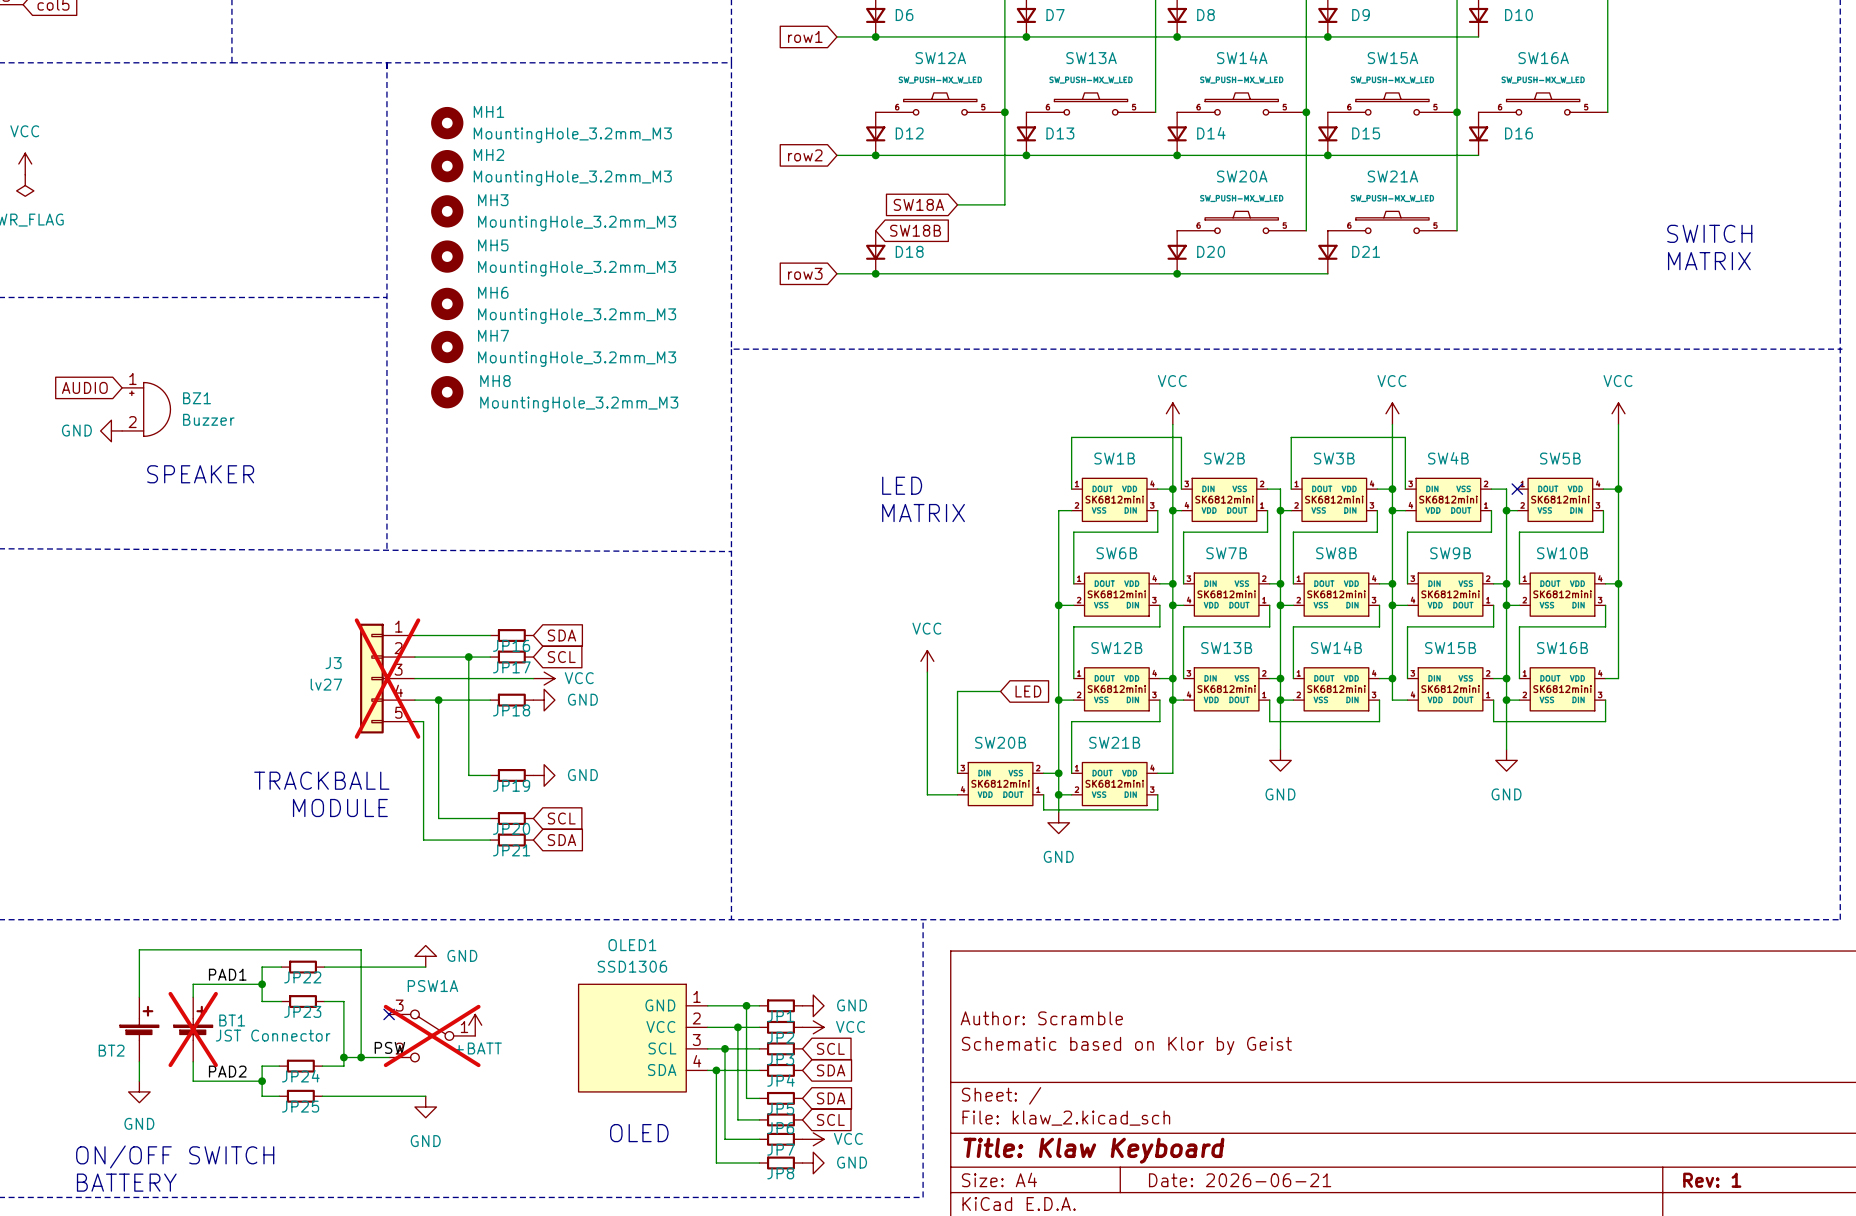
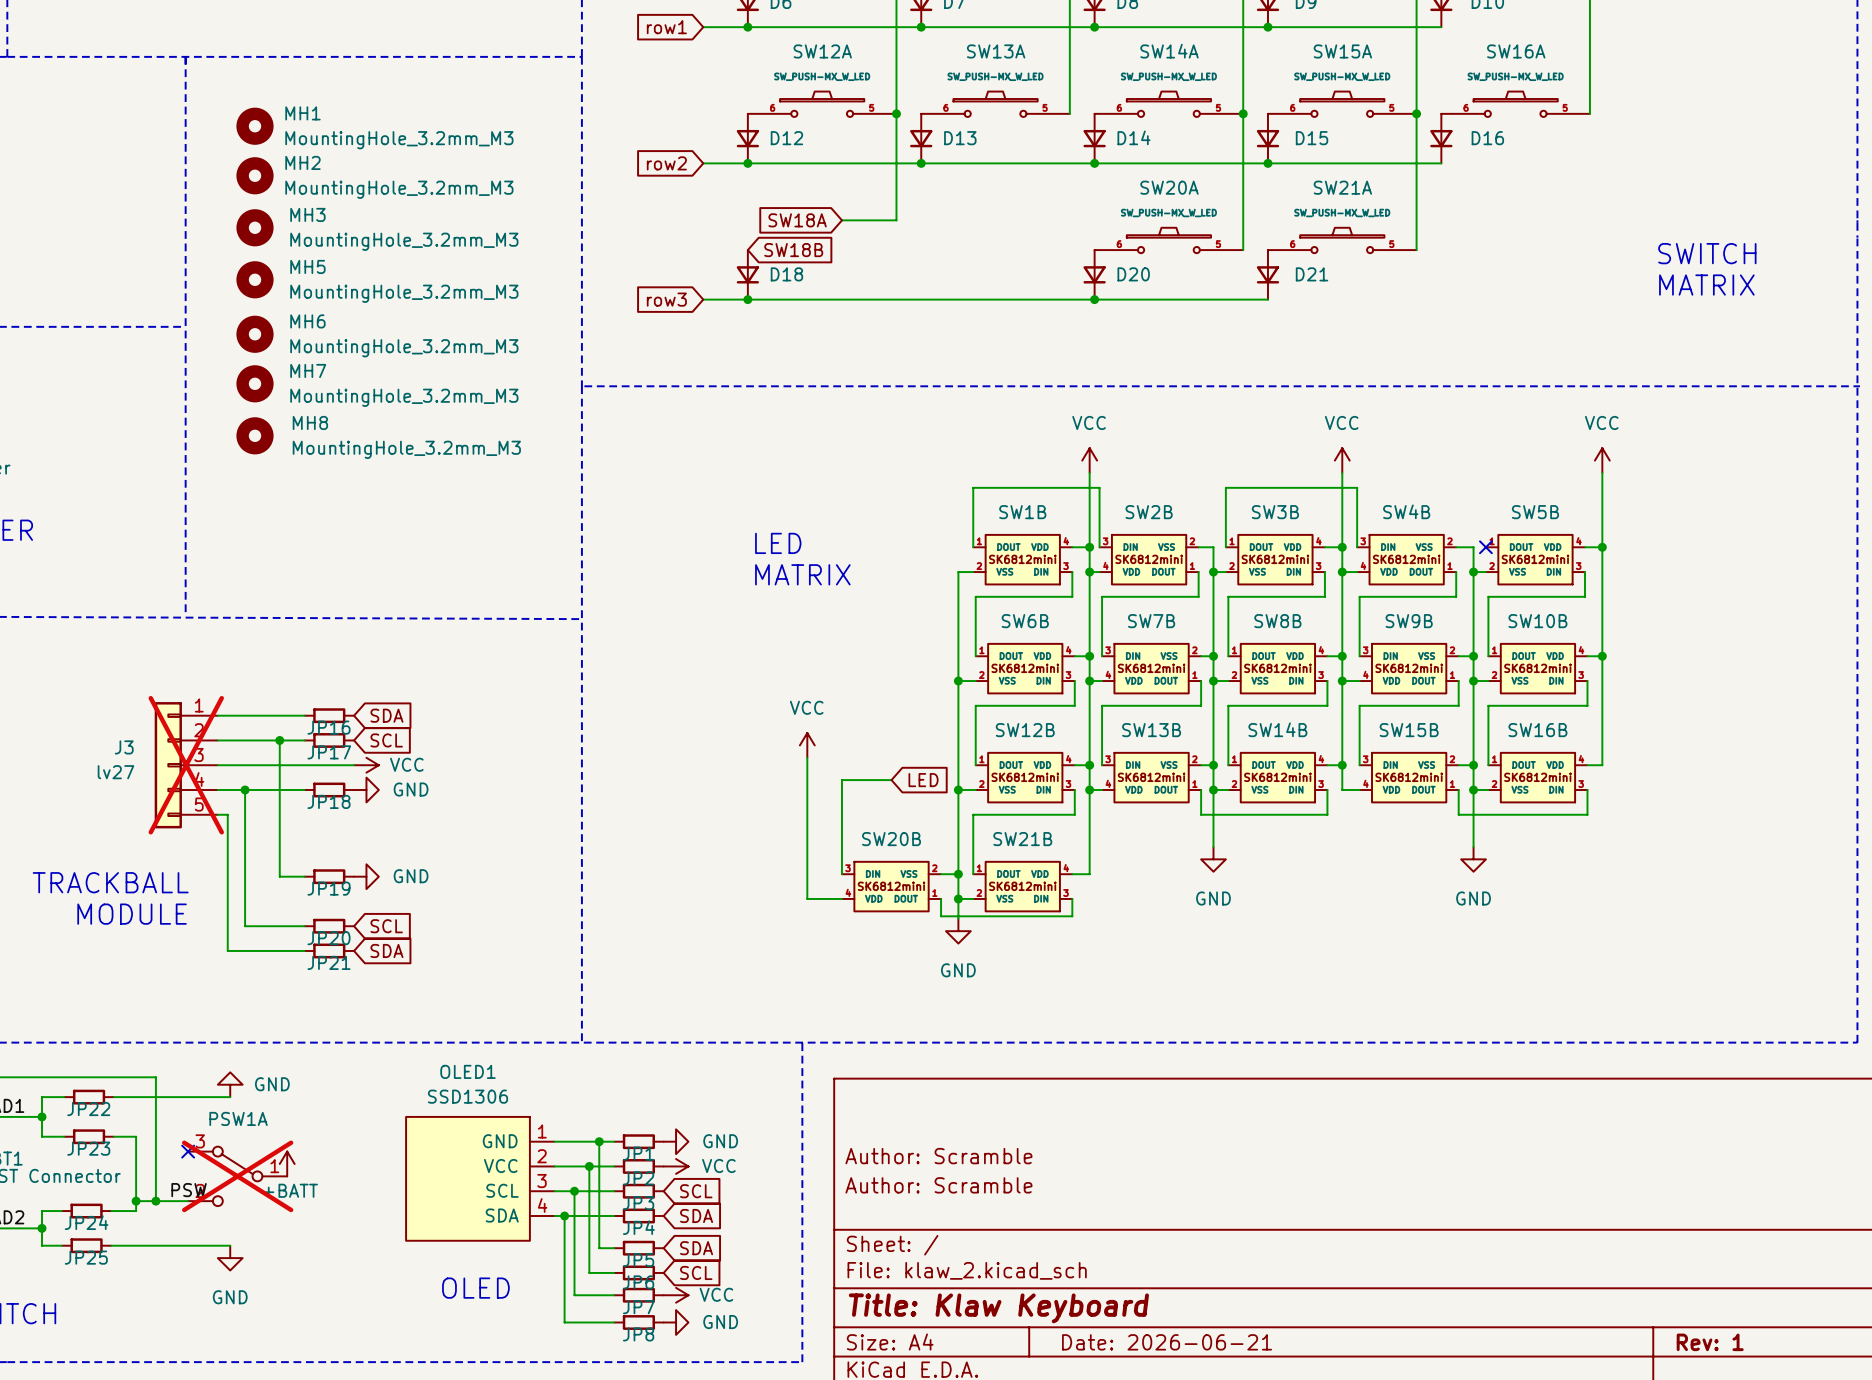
title block: Schematic based on Klor by Geist (1126, 1045) -> Author: Scramble (938, 1185)

